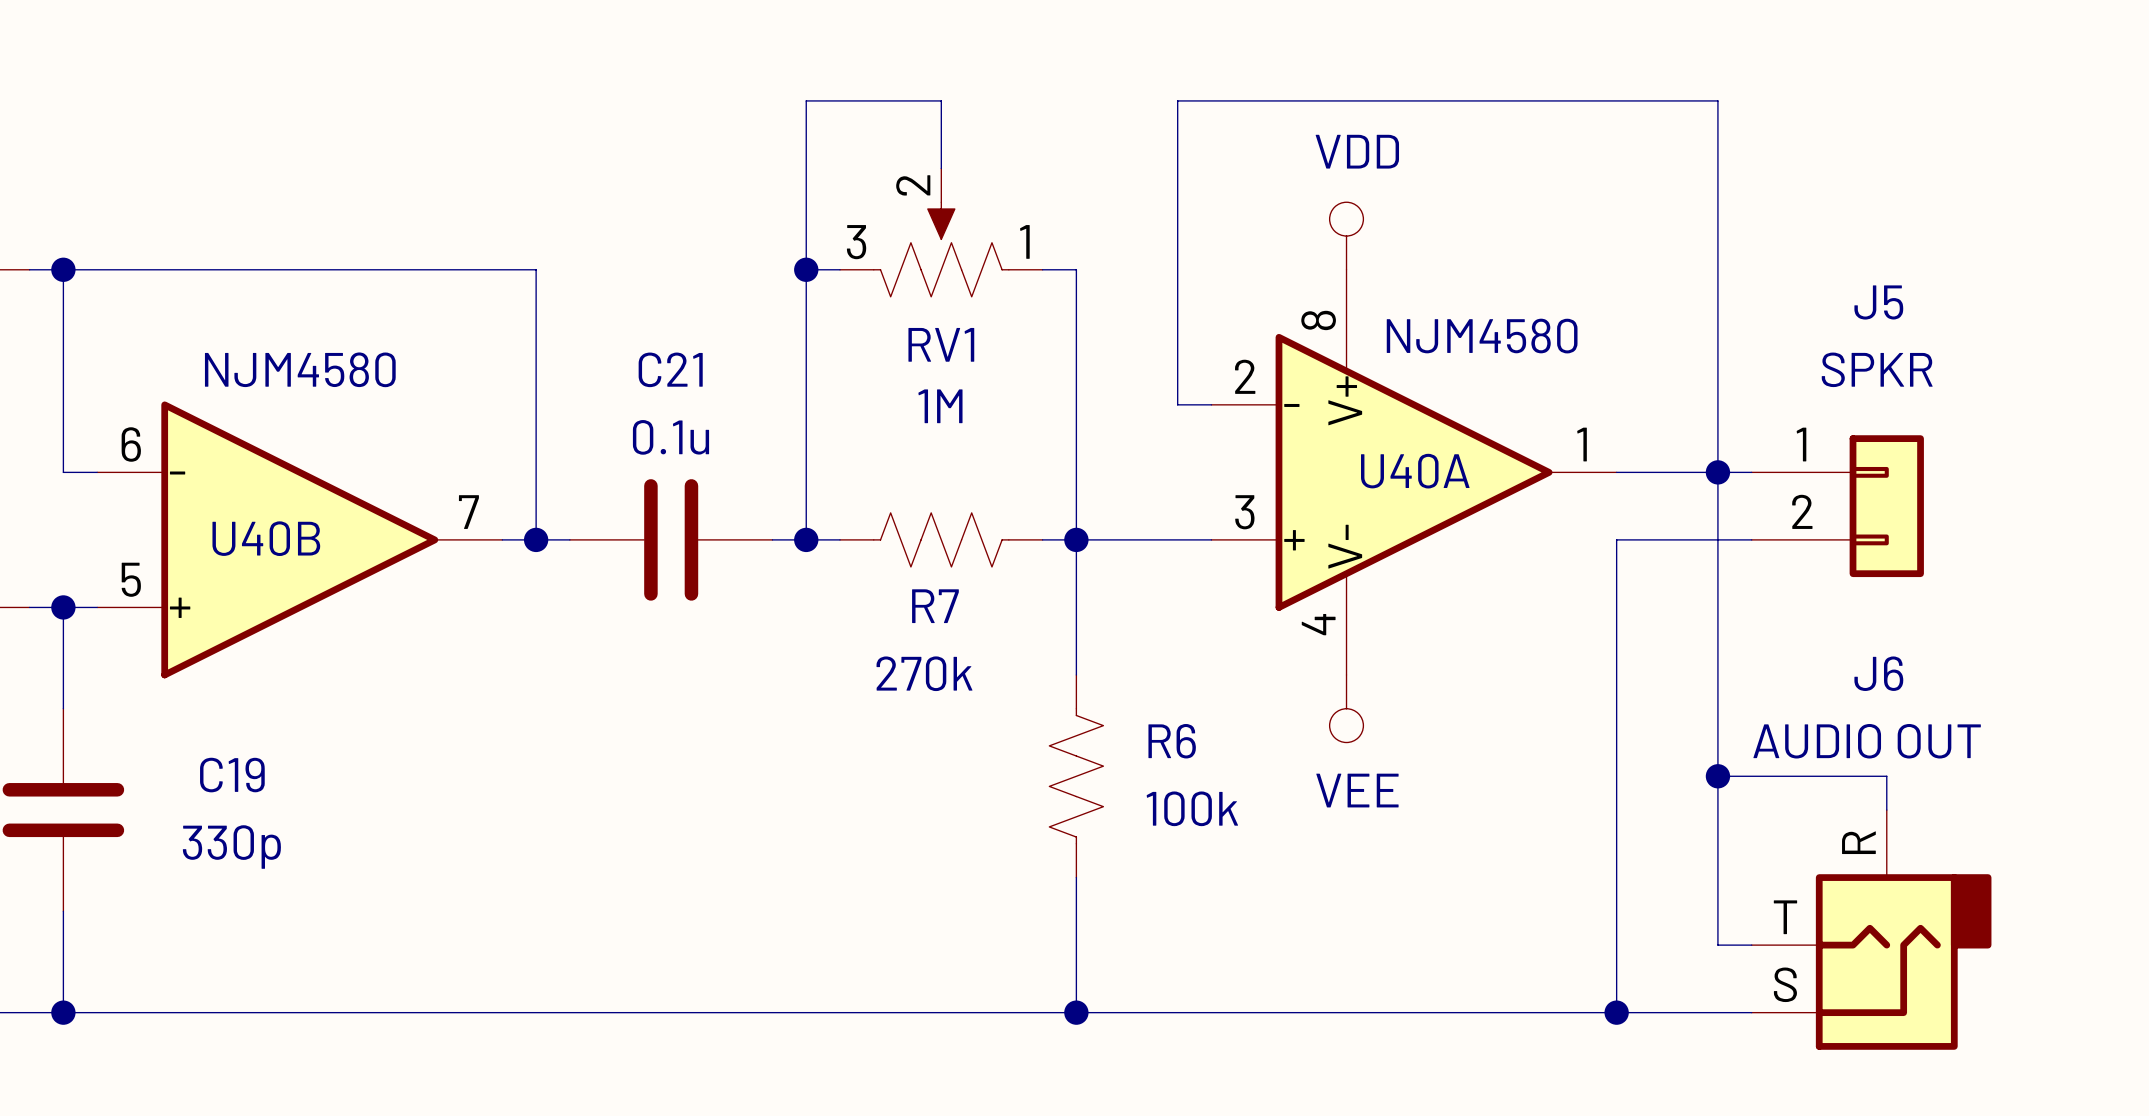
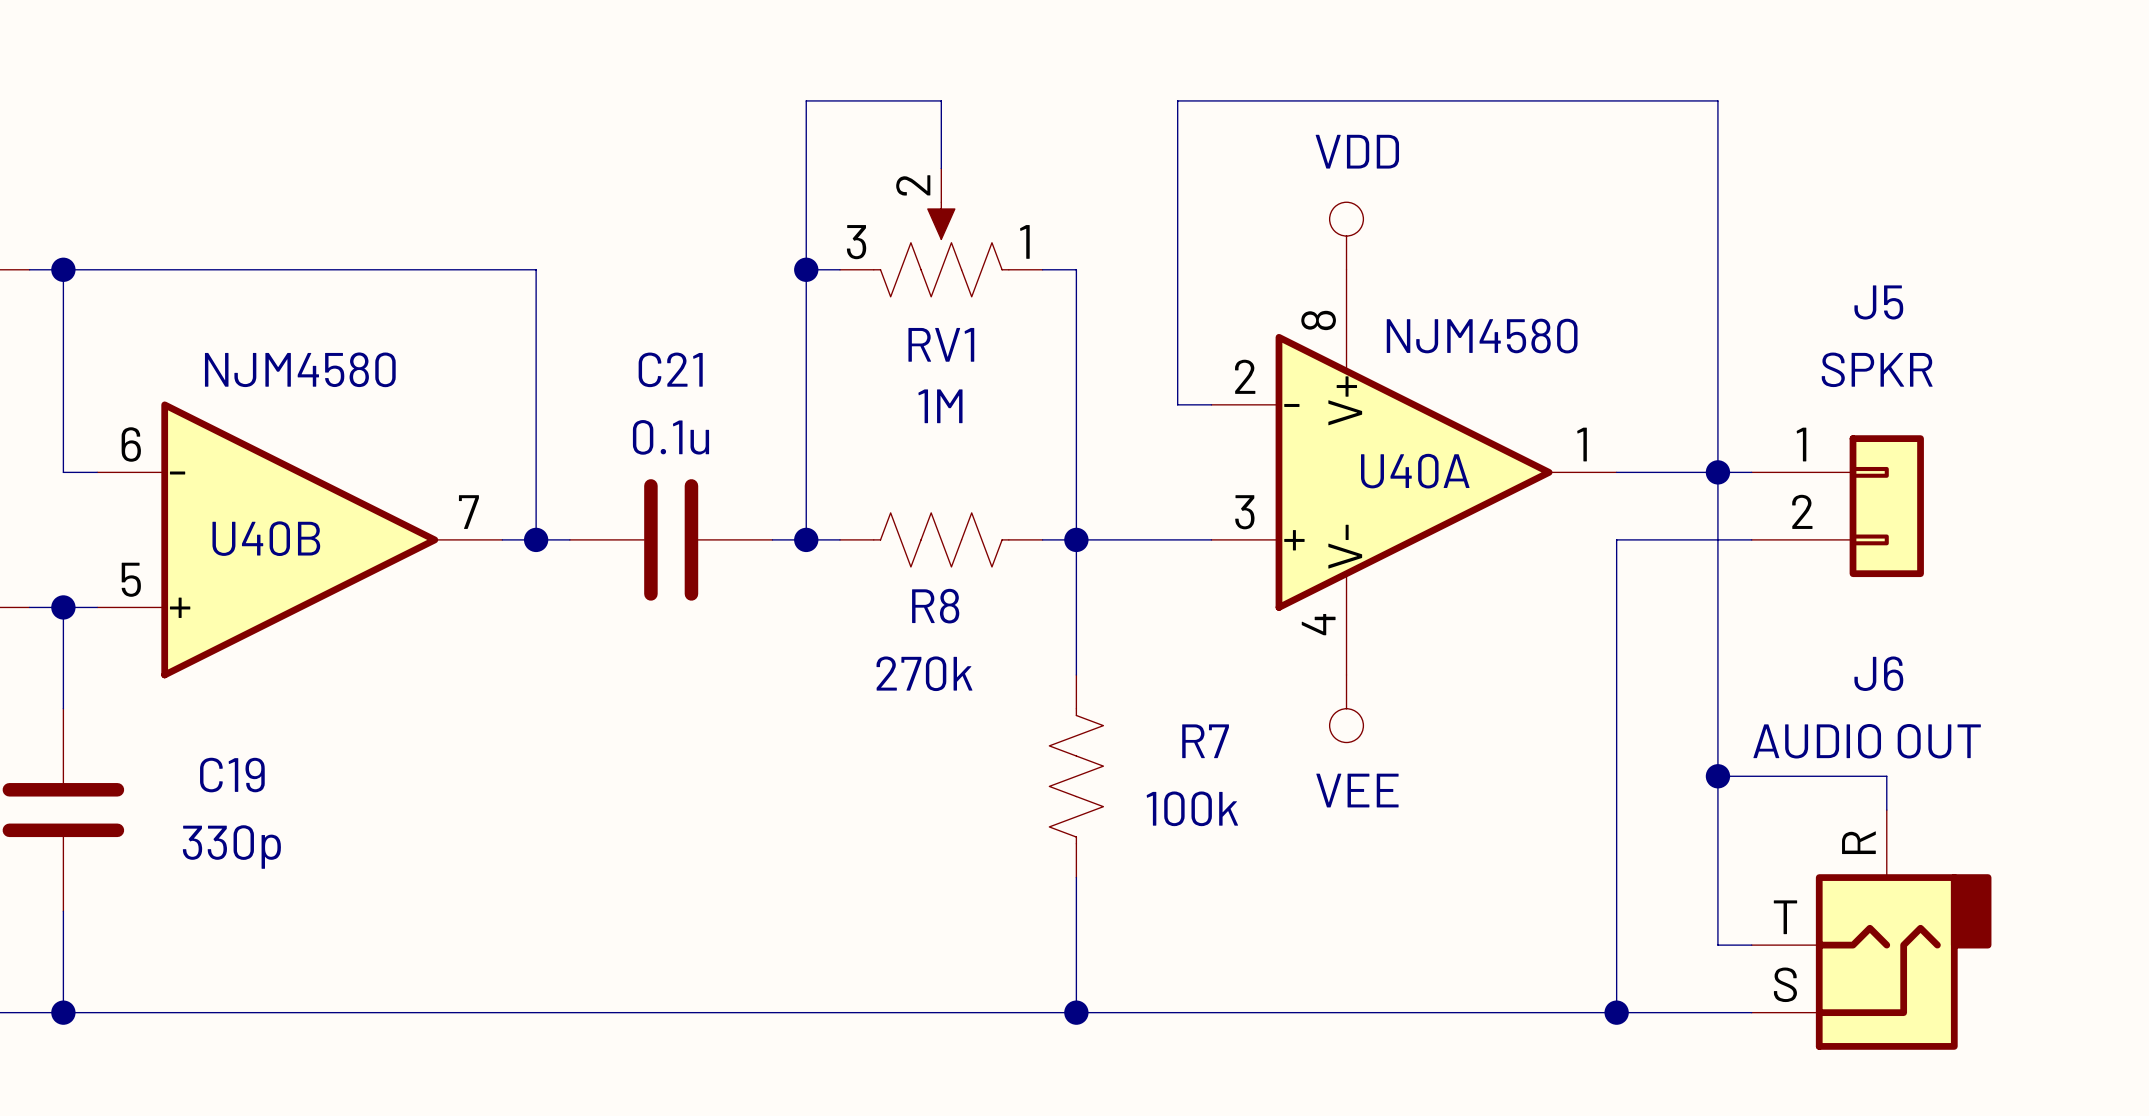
R7 name: R7 (935, 606) -> R8 (935, 606)
R6 name: R6 (1172, 741) -> R7 (1205, 741)

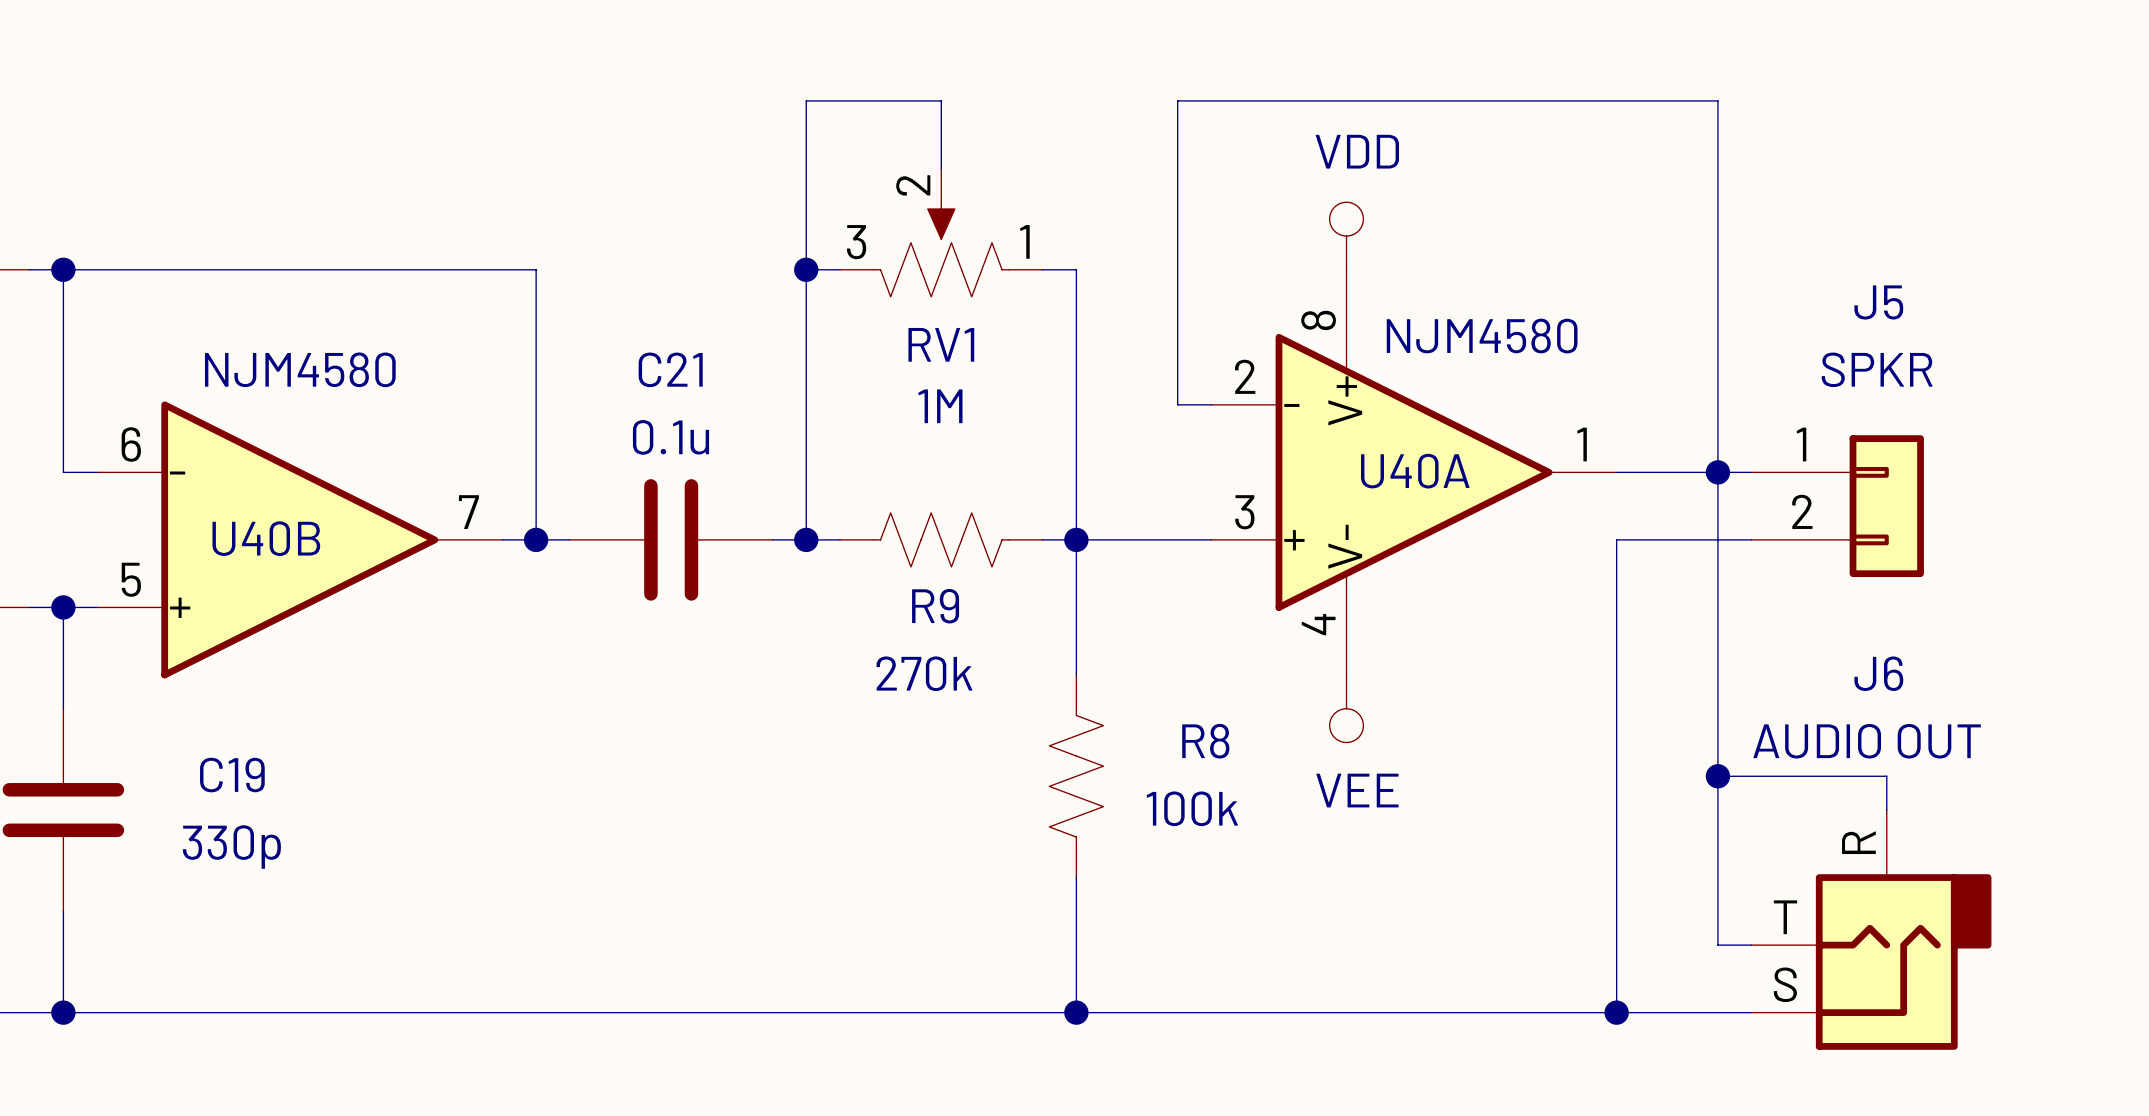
R8 name: R8 (935, 606) -> R9 (935, 606)
R7 name: R7 (1205, 741) -> R8 (1205, 741)

